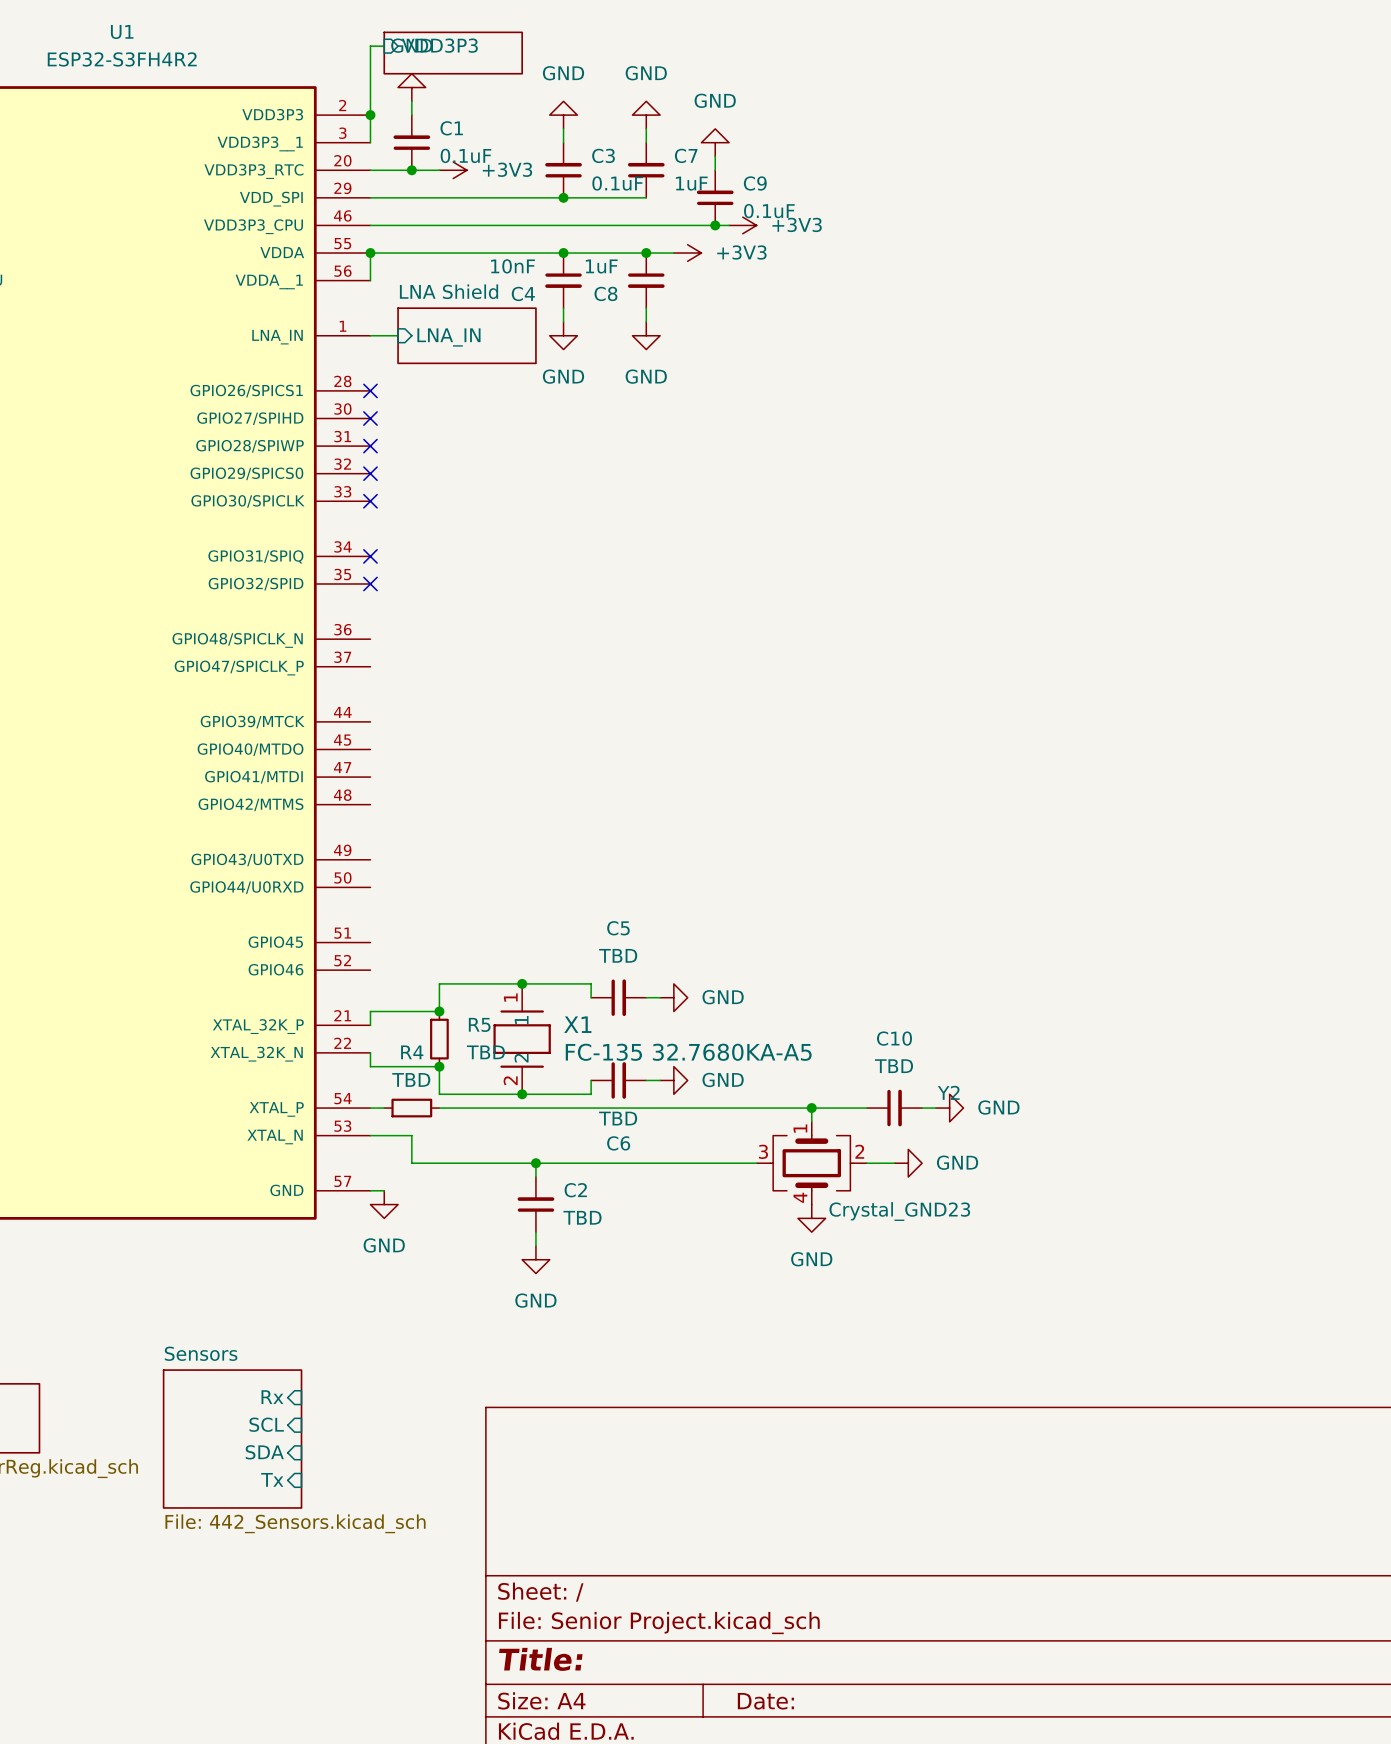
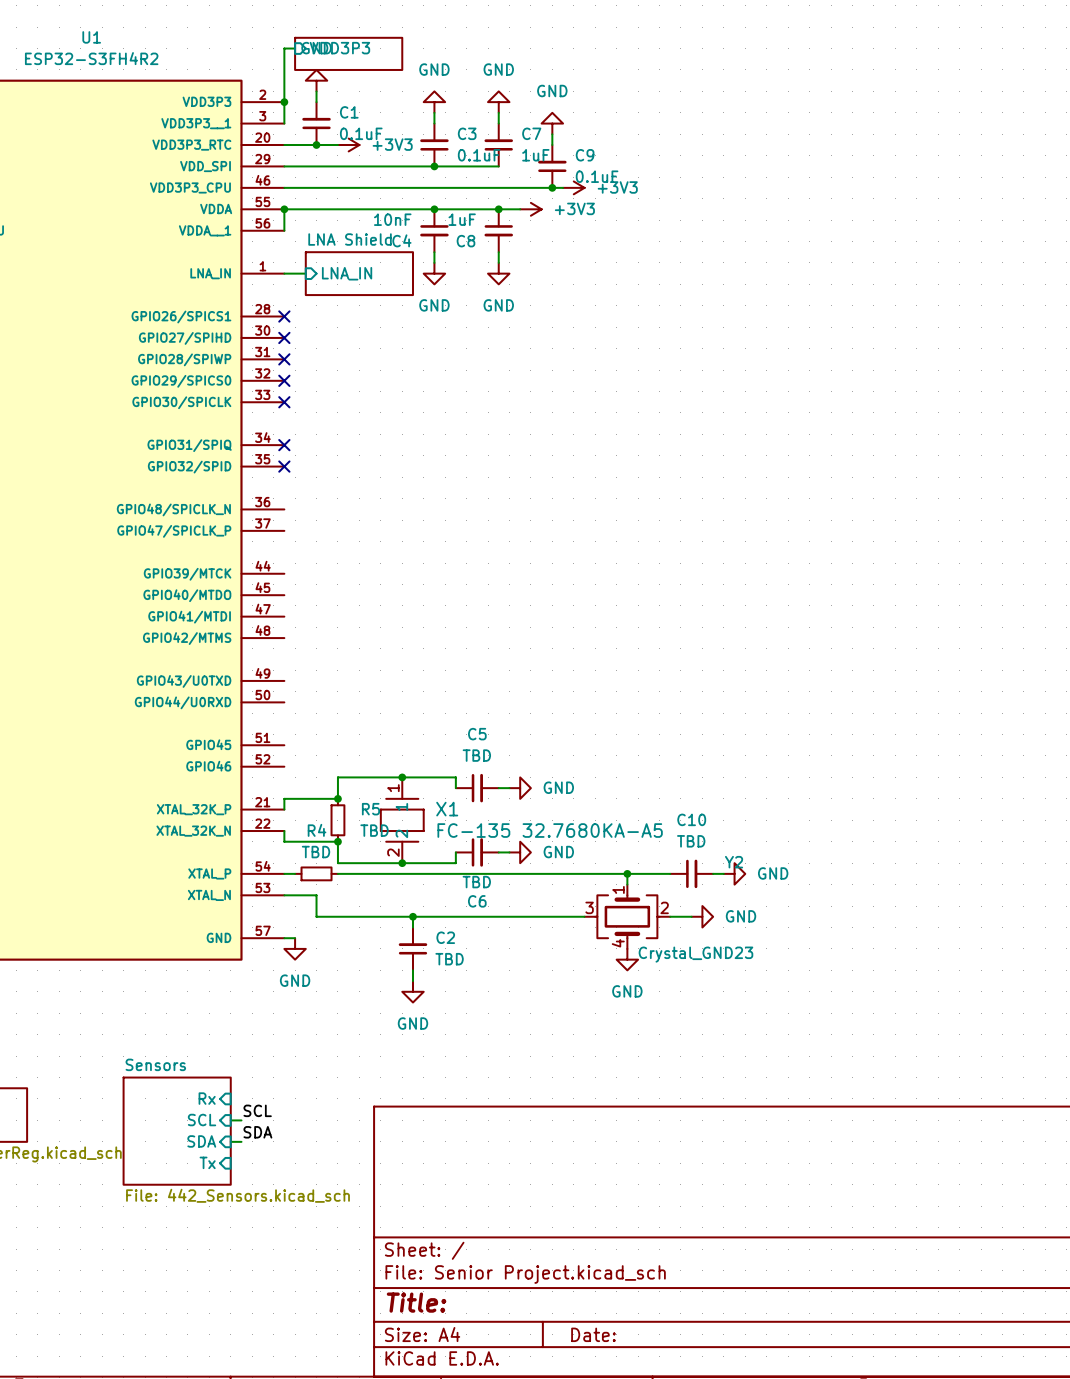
label: none -> SCL (257, 1110)
wire: none -> (230, 1120) (241, 1120)
label: none -> SDA (257, 1132)
wire: none -> (230, 1141) (241, 1141)

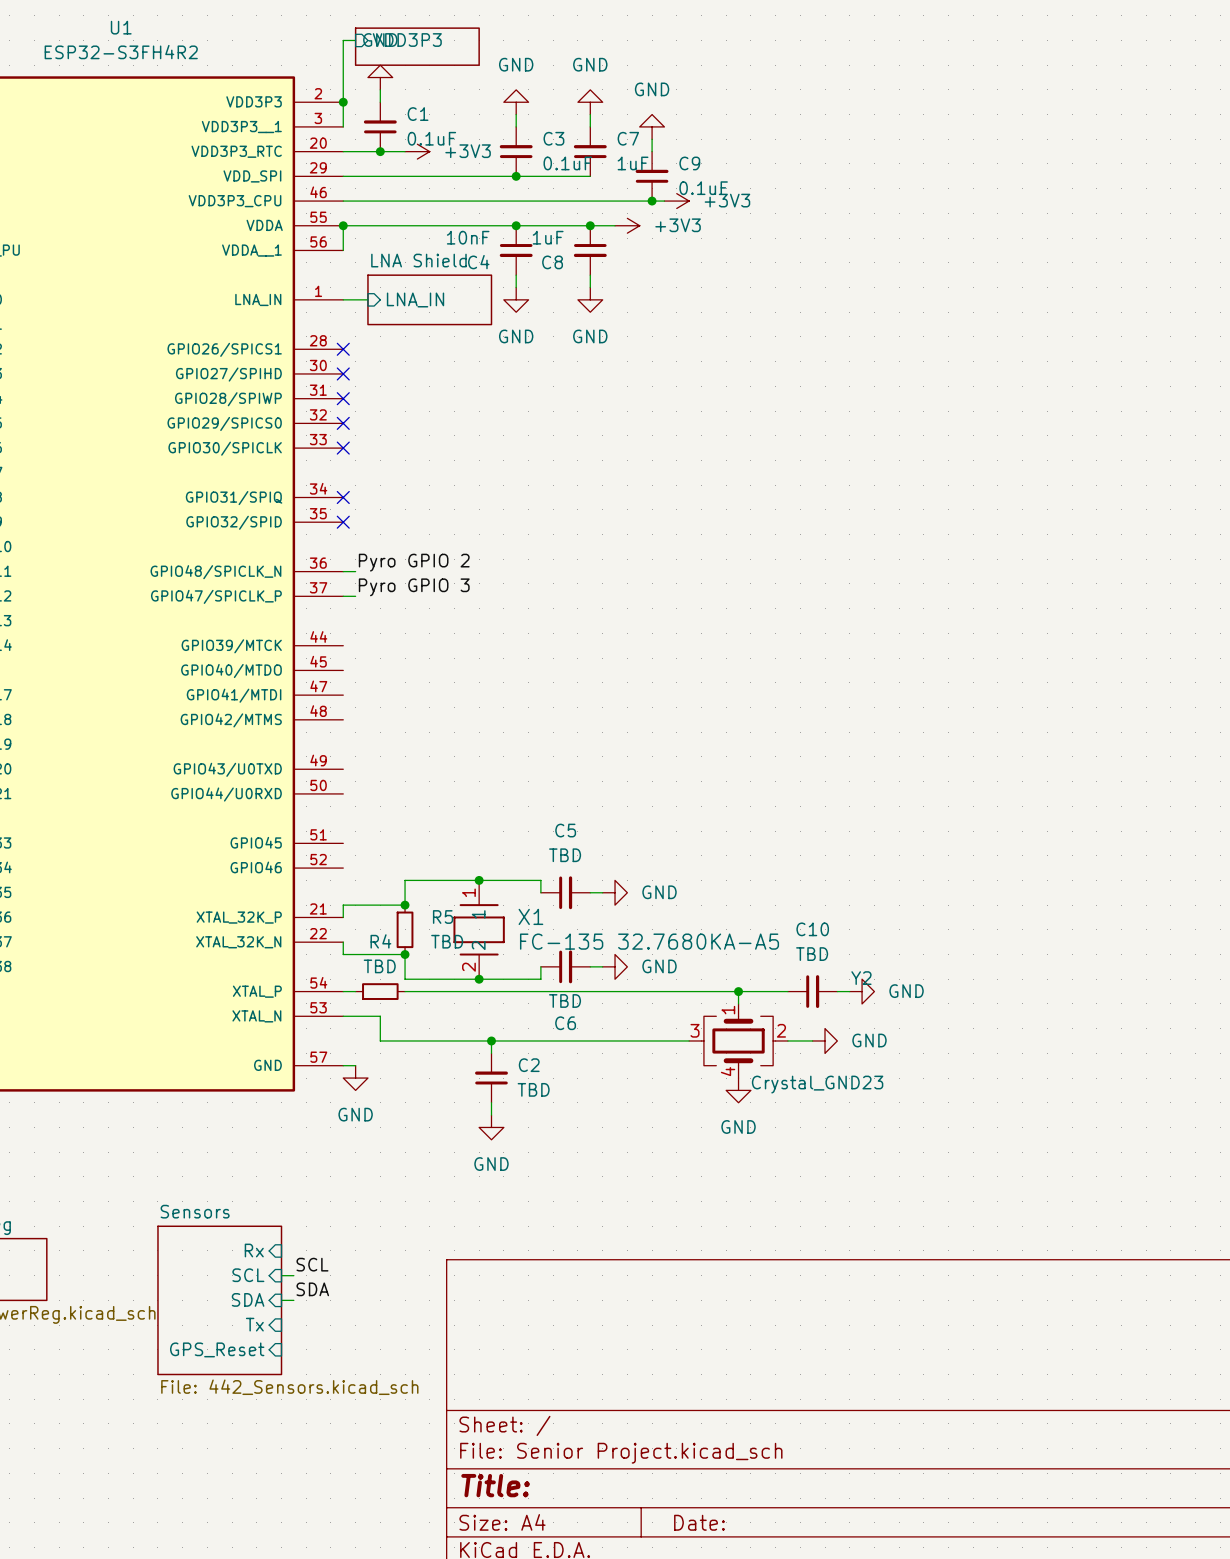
label: none -> Pyro GPIO 2 (414, 562)
wire: none -> (343, 571) (355, 571)
label: none -> Pyro GPIO 3 (414, 587)
wire: none -> (343, 596) (355, 596)
sheet Sensors: File: 442_Sensors.kicad_sch (177, 1131) -> none
sheet Sensors: none -> File: 442_Sensors.kicad_sch (219, 1300)
sheet pin: none -> GPS_Reset (217, 1349)

